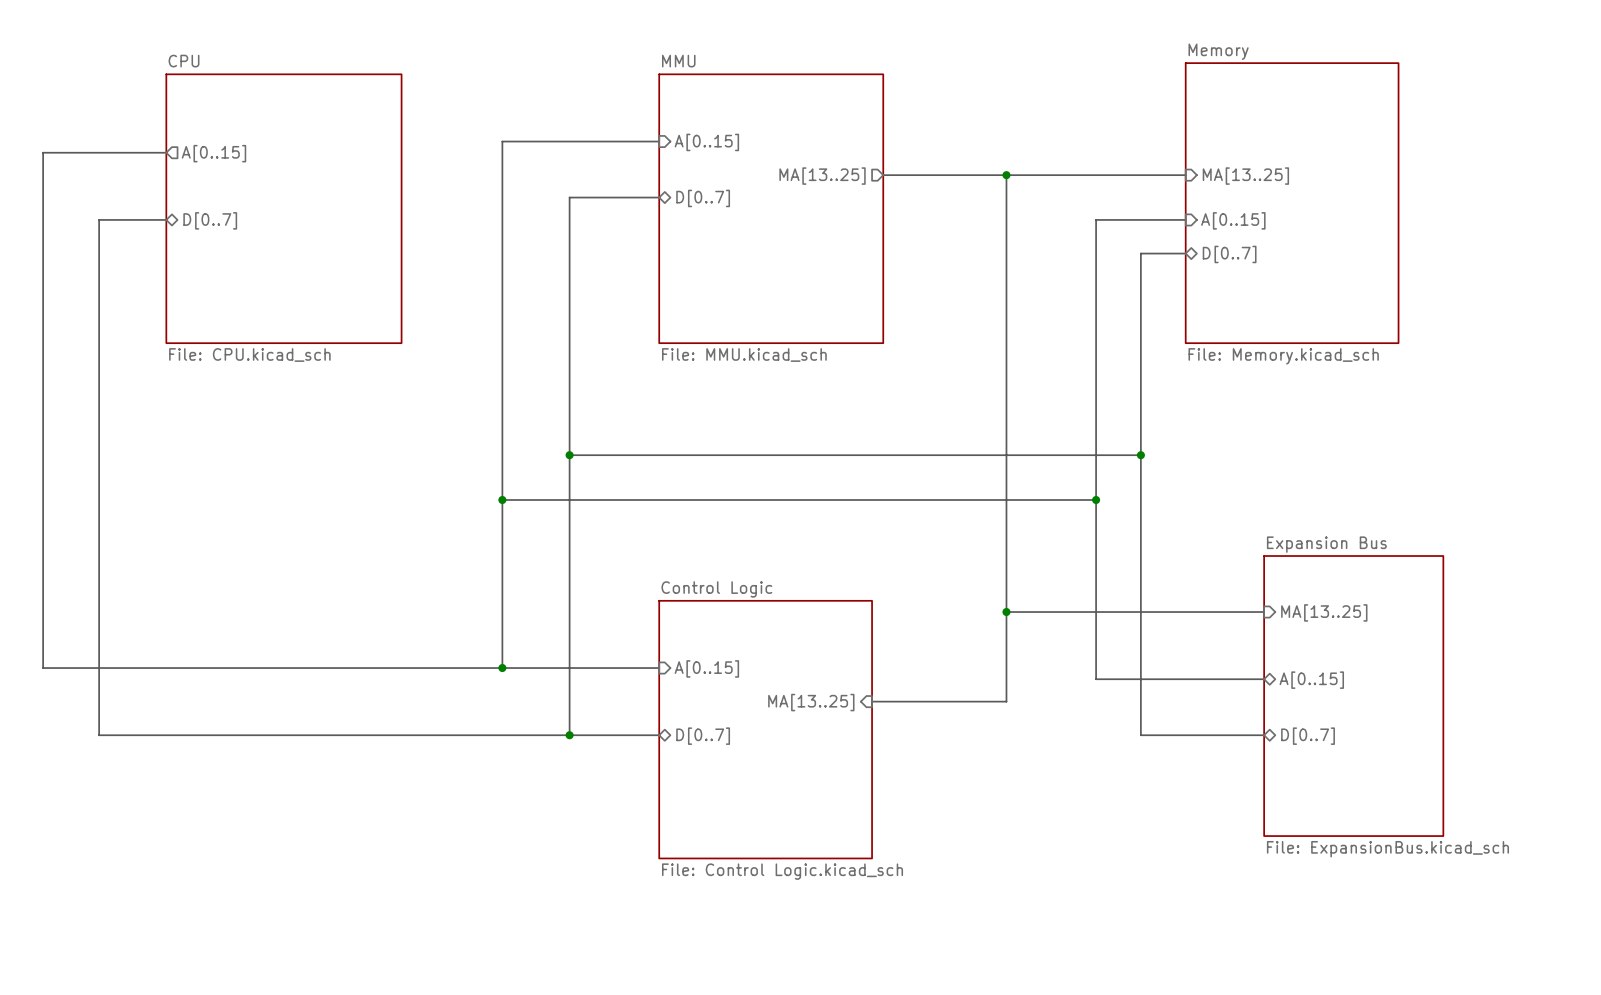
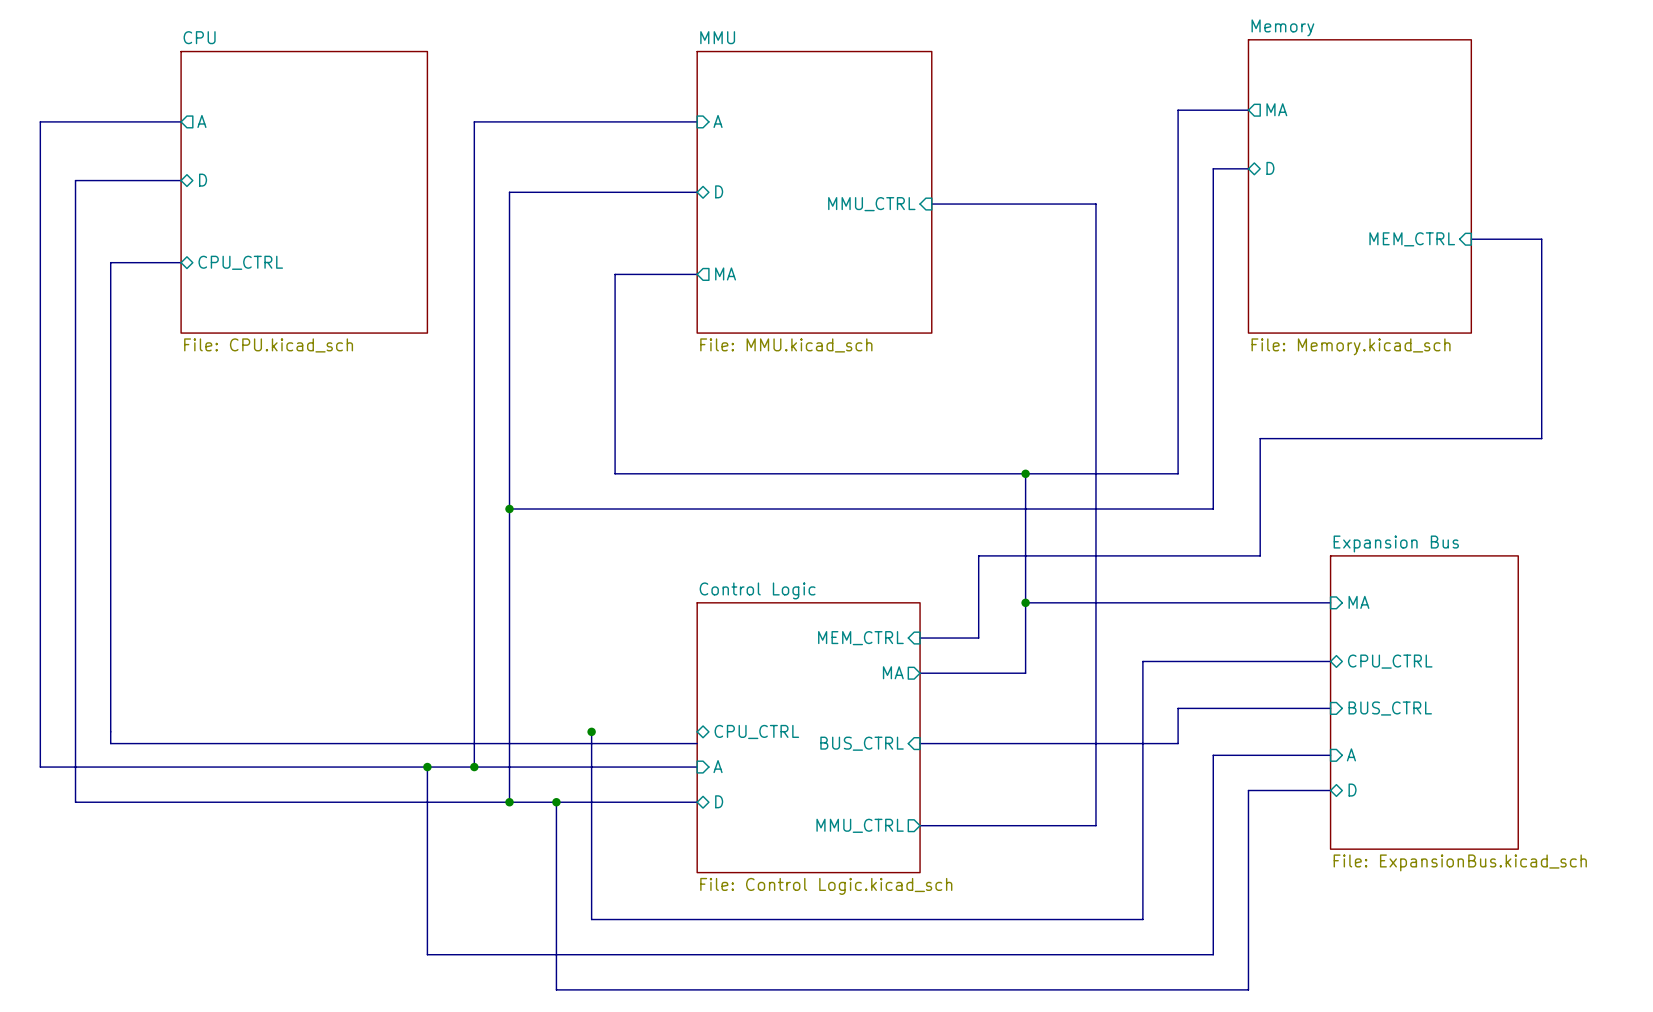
sheet pin: none -> MA (1276, 109)
bus: none -> (1248, 110) (1178, 110) (1178, 473) (615, 473) (615, 274) (697, 274)
bus: none -> (181, 121) (40, 121) (40, 767) (697, 767)
sheet pin: none -> A (201, 121)
bus: (502, 141) (502, 668) -> (532, 121) (474, 121) (474, 767)
sheet pin: A[0..15] (706, 142) -> A (718, 121)
bus: (166, 152) (43, 152) (43, 668) (659, 668) -> none
sheet pin: A[0..15] (213, 153) -> none
bus: (883, 175) (1185, 175) -> none
bus: (1006, 175) (1006, 701) (872, 701) -> none
junction: (1006, 175) -> none
sheet pin: MA[13..25] (822, 176) -> none
sheet pin: MA[13..25] (1245, 176) -> none
sheet pin: none -> D (1270, 168)
bus: none -> (1248, 168) (1213, 168) (1213, 508) (509, 508)
bus: none -> (181, 180) (75, 180) (75, 802) (697, 802)
sheet pin: none -> D (203, 180)
bus: (659, 197) (569, 197) (569, 735) -> none
sheet pin: D[0..7] (703, 198) -> none
bus: none -> (697, 192) (509, 192) (509, 802)
sheet pin: none -> D (719, 191)
bus: (166, 219) (99, 219) (99, 275) -> (181, 262) (110, 262)
bus: none -> (931, 204) (1095, 204) (1095, 825) (920, 825)
bus: (1185, 219) (1096, 219) (1096, 679) (1264, 679) -> none
sheet pin: D[0..7] (210, 220) -> none
sheet pin: none -> MMU_CTRL (871, 204)
sheet pin: A[0..15] (1233, 220) -> none
bus: (1185, 253) (1140, 253) (1140, 735) (1264, 735) -> none
sheet pin: none -> MEM_CTRL (1412, 239)
bus: none -> (1471, 239) (1541, 239) (1541, 438) (1260, 438) (1260, 555) (978, 555) (978, 638) (920, 638)
sheet pin: D[0..7] (1229, 254) -> none
sheet pin: none -> CPU_CTRL (240, 262)
sheet pin: none -> MA (725, 273)
bus: (569, 455) (1140, 455) -> none
junction: (569, 455) -> none
junction: (1140, 455) -> none
bus: none -> (1025, 473) (1025, 673) (920, 673)
junction: none -> (1025, 473)
bus: (502, 499) (1096, 499) -> none
junction position: (502, 499) -> (509, 508)
junction: (1096, 499) -> none
bus: none -> (1025, 602) (1330, 602)
sheet pin: none -> MA (1358, 602)
bus: (1006, 612) (1264, 612) -> none
junction position: (1006, 612) -> (1025, 602)
sheet pin: MA[13..25] (1324, 612) -> none
sheet pin: none -> MEM_CTRL (860, 638)
bus: none -> (1330, 661) (1142, 661) (1142, 919) (591, 919) (591, 731)
sheet pin: none -> CPU_CTRL (1390, 661)
sheet pin: none -> MA (893, 672)
junction: (502, 668) -> none
sheet pin: A[0..15] (706, 668) -> none
sheet pin: A[0..15] (1311, 680) -> none
bus: none -> (1330, 708) (1178, 708) (1178, 743) (920, 743)
sheet pin: none -> BUS_CTRL (1390, 708)
sheet pin: MA[13..25] (811, 702) -> none
sheet pin: none -> CPU_CTRL (756, 731)
junction position: (569, 735) -> (591, 731)
sheet pin: none -> BUS_CTRL (862, 743)
sheet pin: D[0..7] (703, 736) -> none
sheet pin: D[0..7] (1308, 736) -> none
bus: none -> (1330, 755) (1213, 755) (1213, 954) (427, 954) (427, 767)
sheet pin: none -> A (1351, 754)
junction: none -> (427, 767)
junction: none -> (474, 767)
sheet pin: none -> A (718, 766)
sheet pin: none -> D (1352, 790)
bus: none -> (1330, 790) (1248, 790) (1248, 989) (556, 989) (556, 802)
sheet pin: none -> D (719, 801)
junction: none -> (509, 802)
junction: none -> (556, 802)
sheet pin: none -> MMU_CTRL (860, 825)

